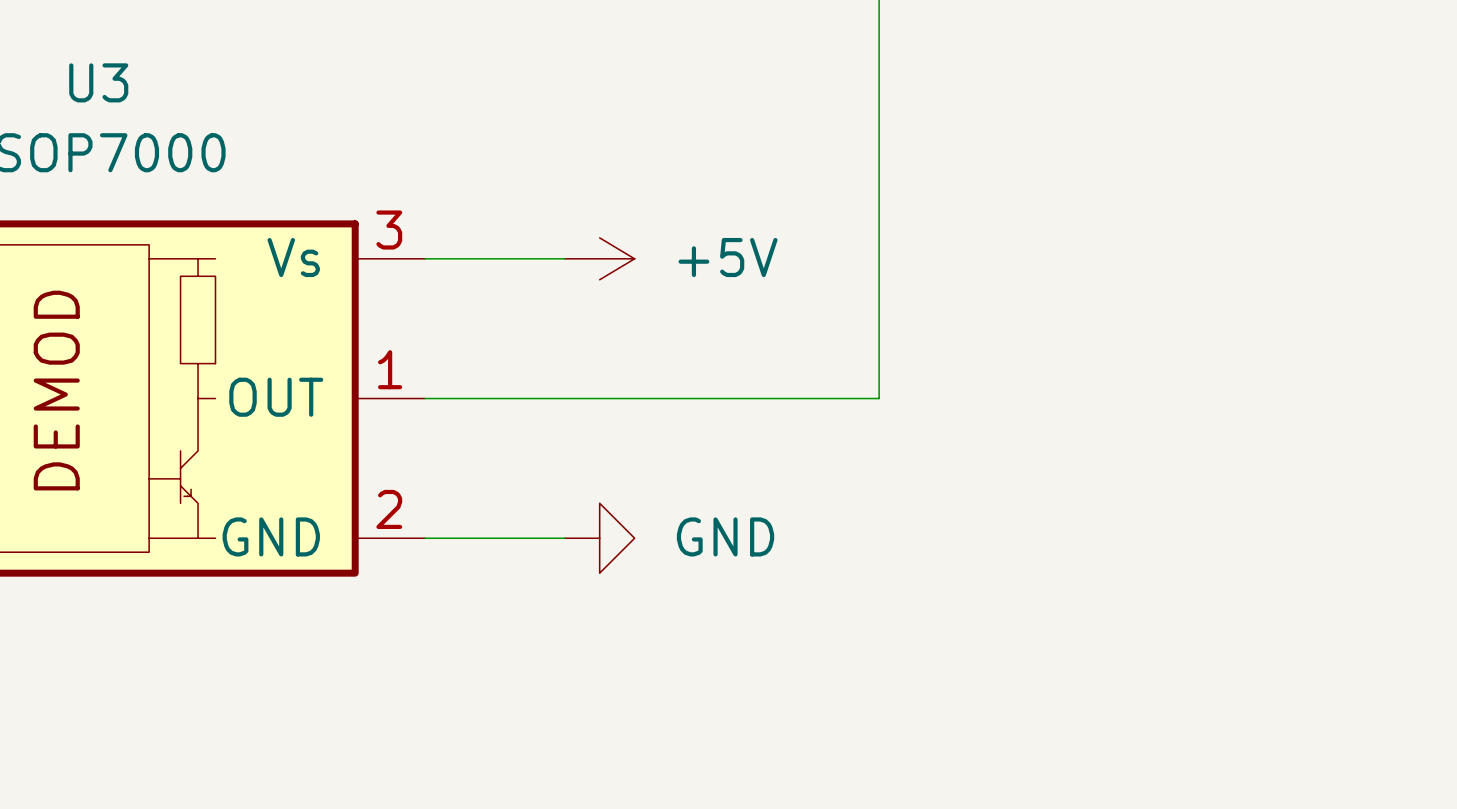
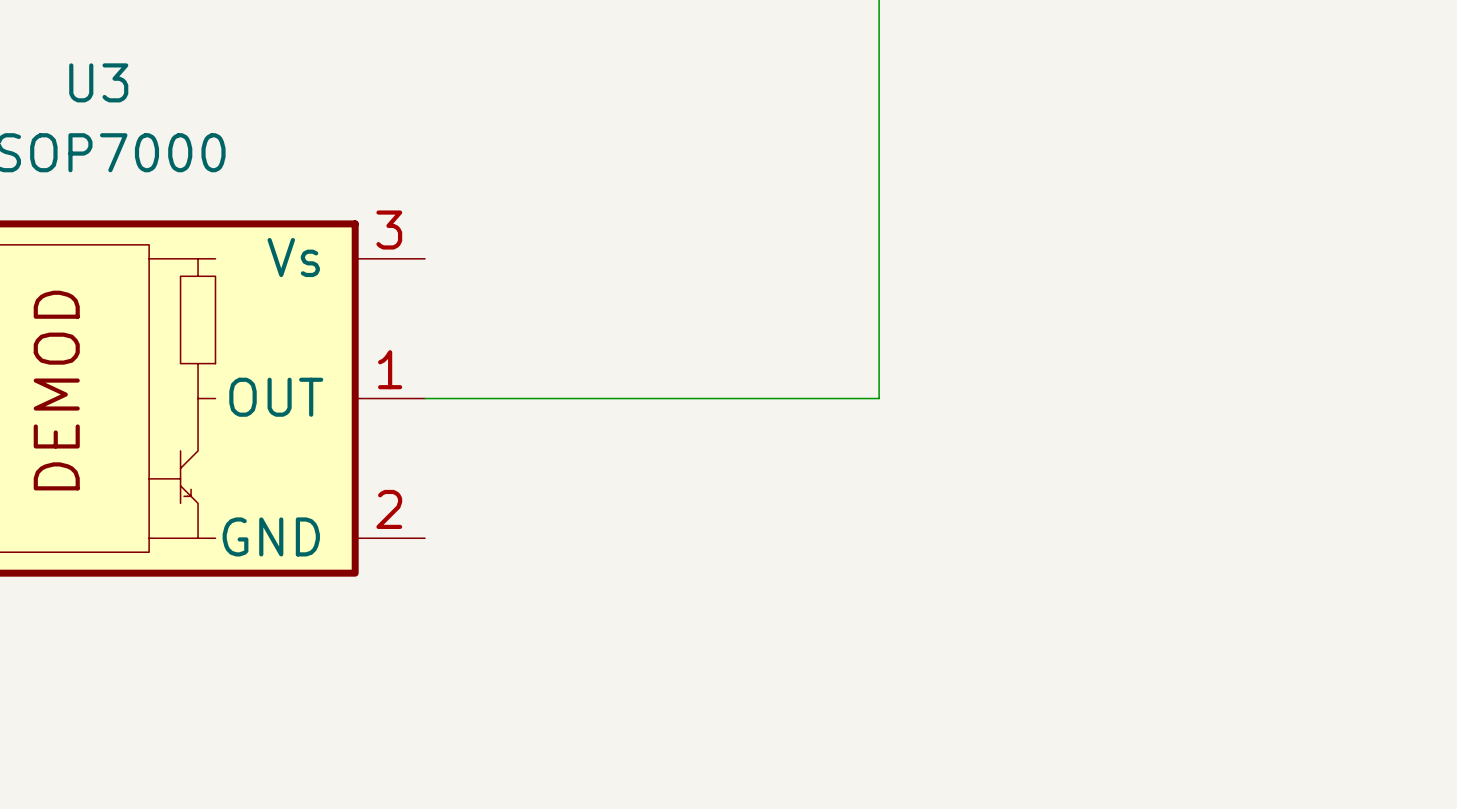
wire: (425, 258) (564, 258) -> none
power symbol: +5V (599, 258) -> none
wire: (425, 538) (564, 538) -> none
power symbol: GND (599, 538) -> none

